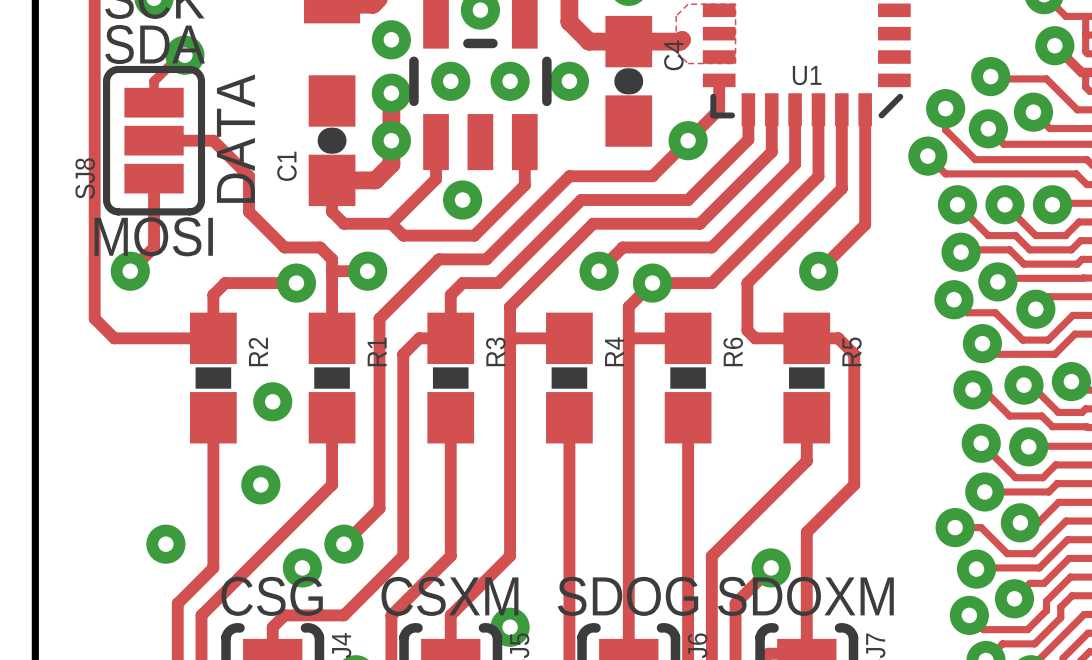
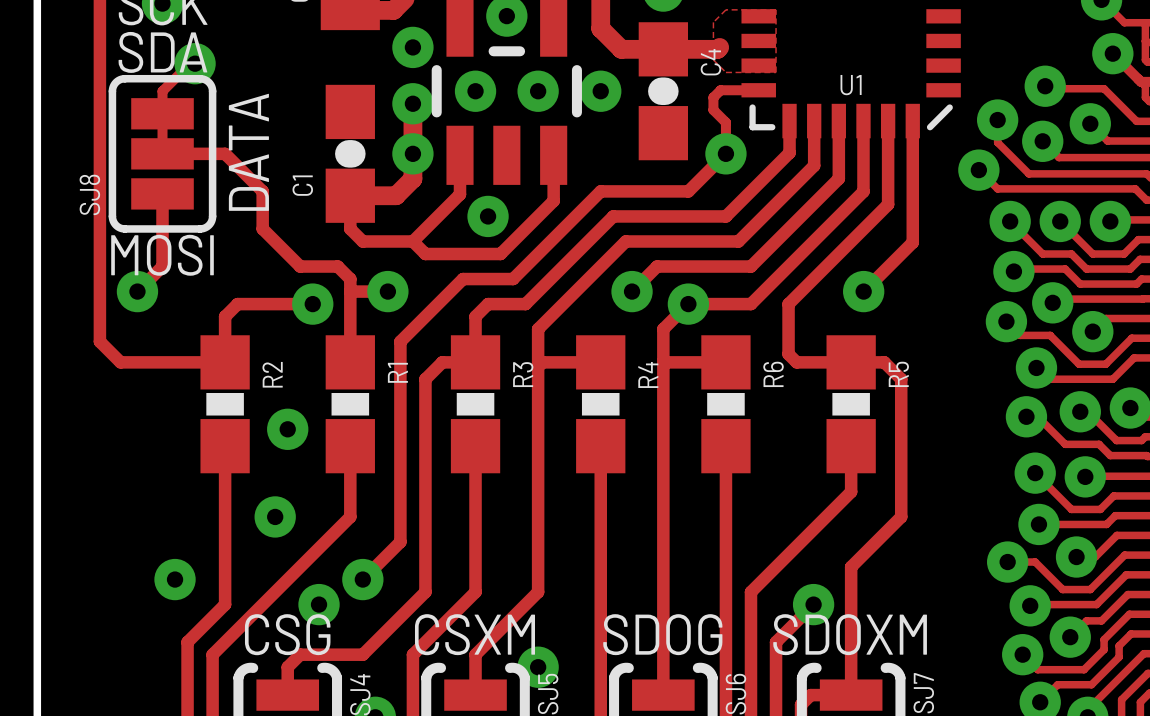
SJ8 footprint: [103, 65, 206, 216] -> [108, 74, 217, 233]
track: (719, 80) (719, 109) (688, 140) -> (758, 90) (720, 90) (713, 97) (713, 110) (725, 122) (725, 153)

